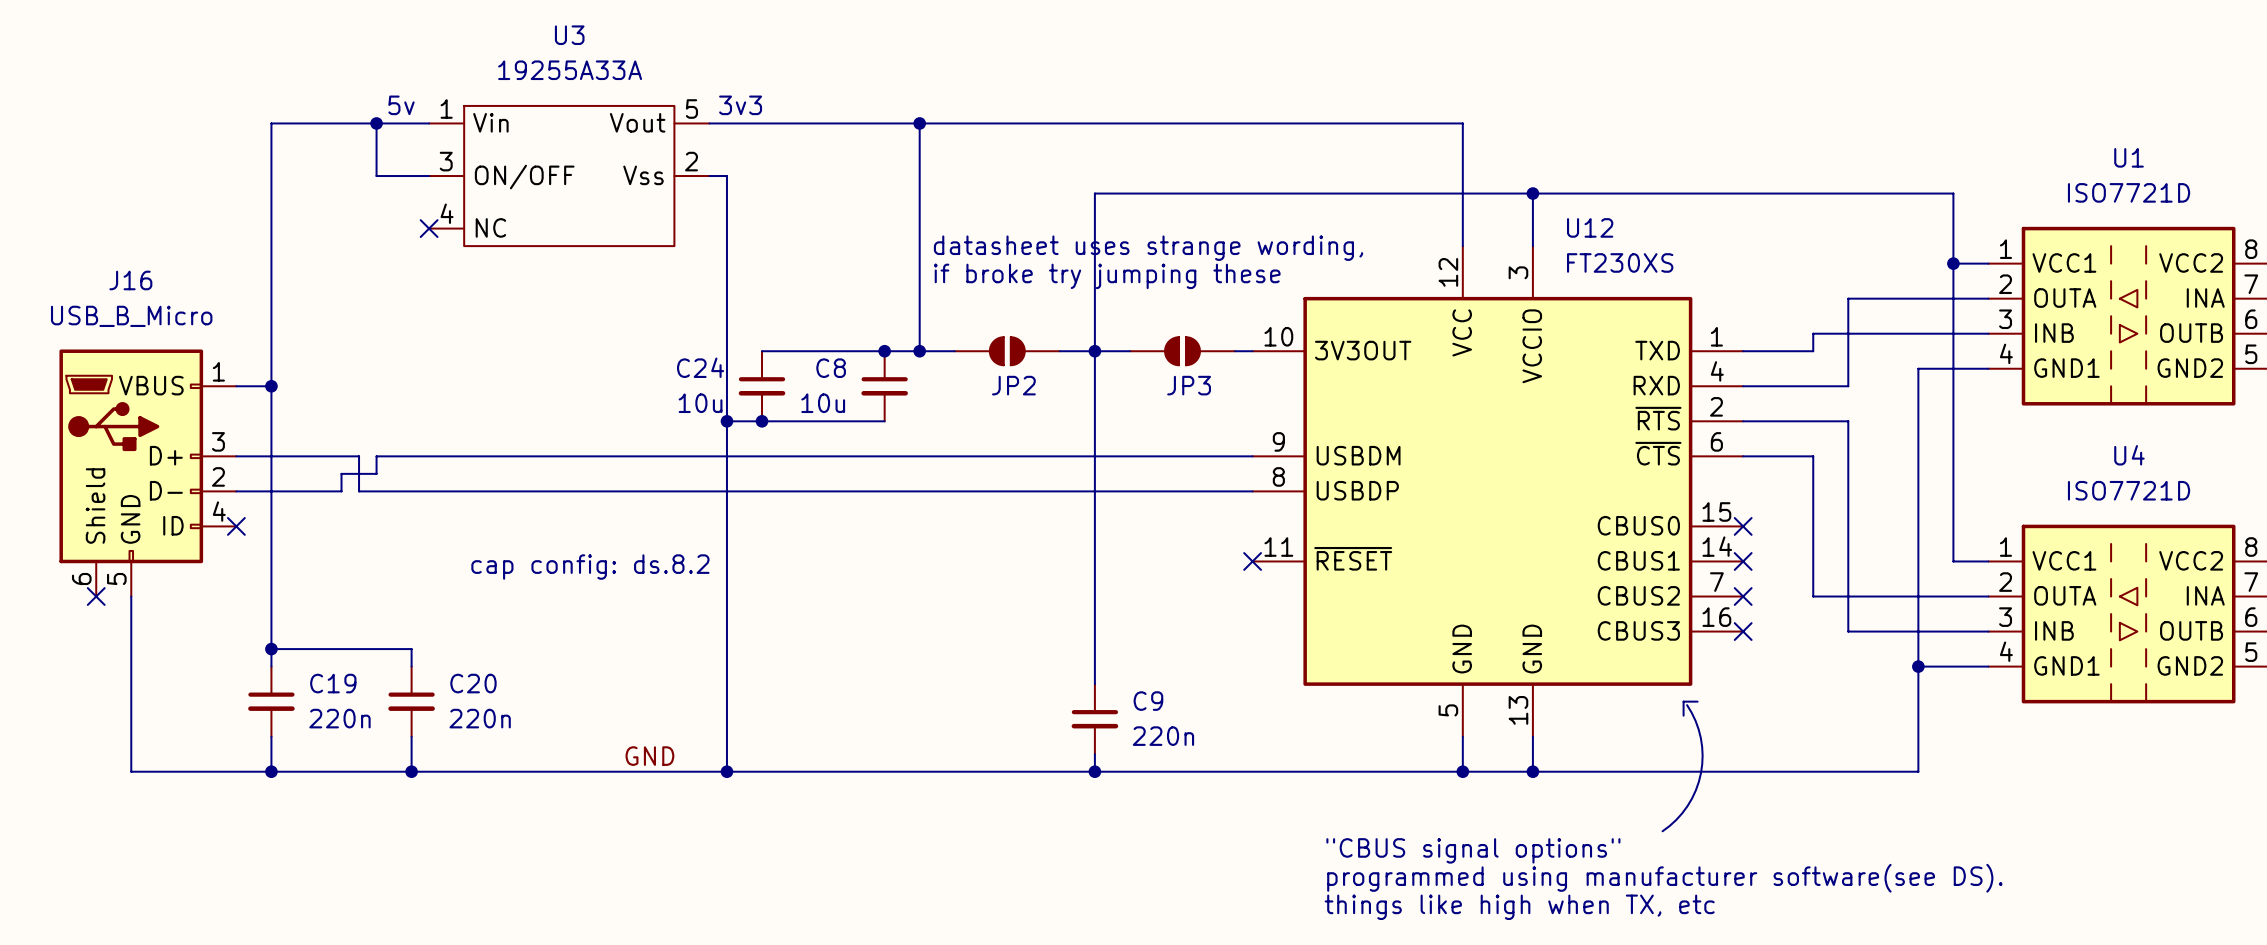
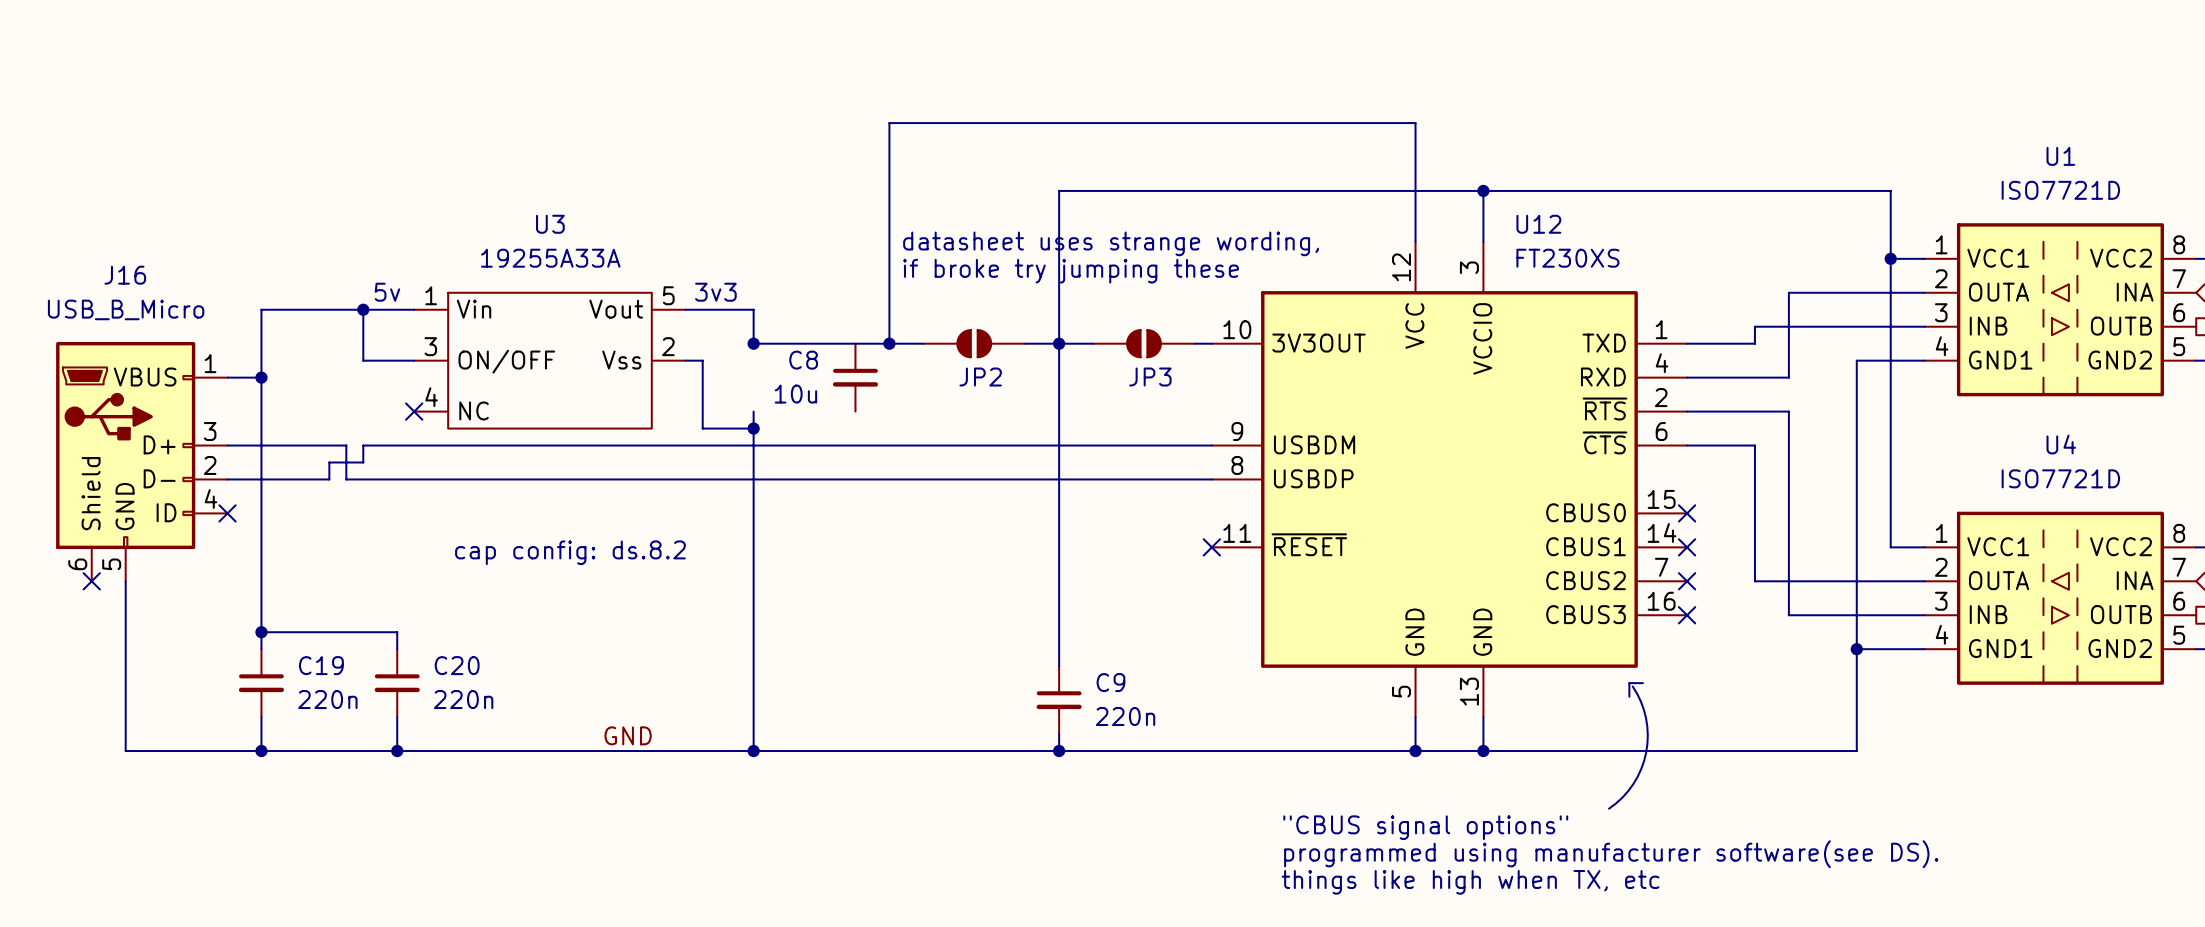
text position: 5v (401, 105) -> 5v (387, 292)
text position: 3v3 (740, 105) -> 3v3 (715, 292)
wire: (376, 123) (376, 176) (429, 176) -> (363, 309) (363, 360) (414, 360)
junction: (376, 123) -> none
wire: (429, 123) (271, 123) (271, 316) -> (414, 309) (261, 309)
wire: (709, 123) (919, 123) -> none
junction: (919, 123) -> none
U3 position: (569, 176) -> (549, 360)
wire: (709, 176) (726, 176) (726, 368) -> (685, 360) (702, 360)
no-connect mark: (429, 228) -> none
junction: none -> (363, 309)
wire: (762, 351) (779, 351) -> (685, 309) (753, 309) (753, 343)
junction: none -> (753, 343)
junction: (884, 351) -> none
C24: 10u (762, 386) -> none
no-connect mark: none -> (414, 411)
wire: (726, 421) (884, 421) -> none
junction: (726, 421) -> none
junction position: (762, 421) -> (753, 428)
wire: none -> (753, 411) (753, 751)
wire: (726, 438) (726, 771) -> (702, 428) (753, 428)
junction position: (726, 771) -> (753, 751)

